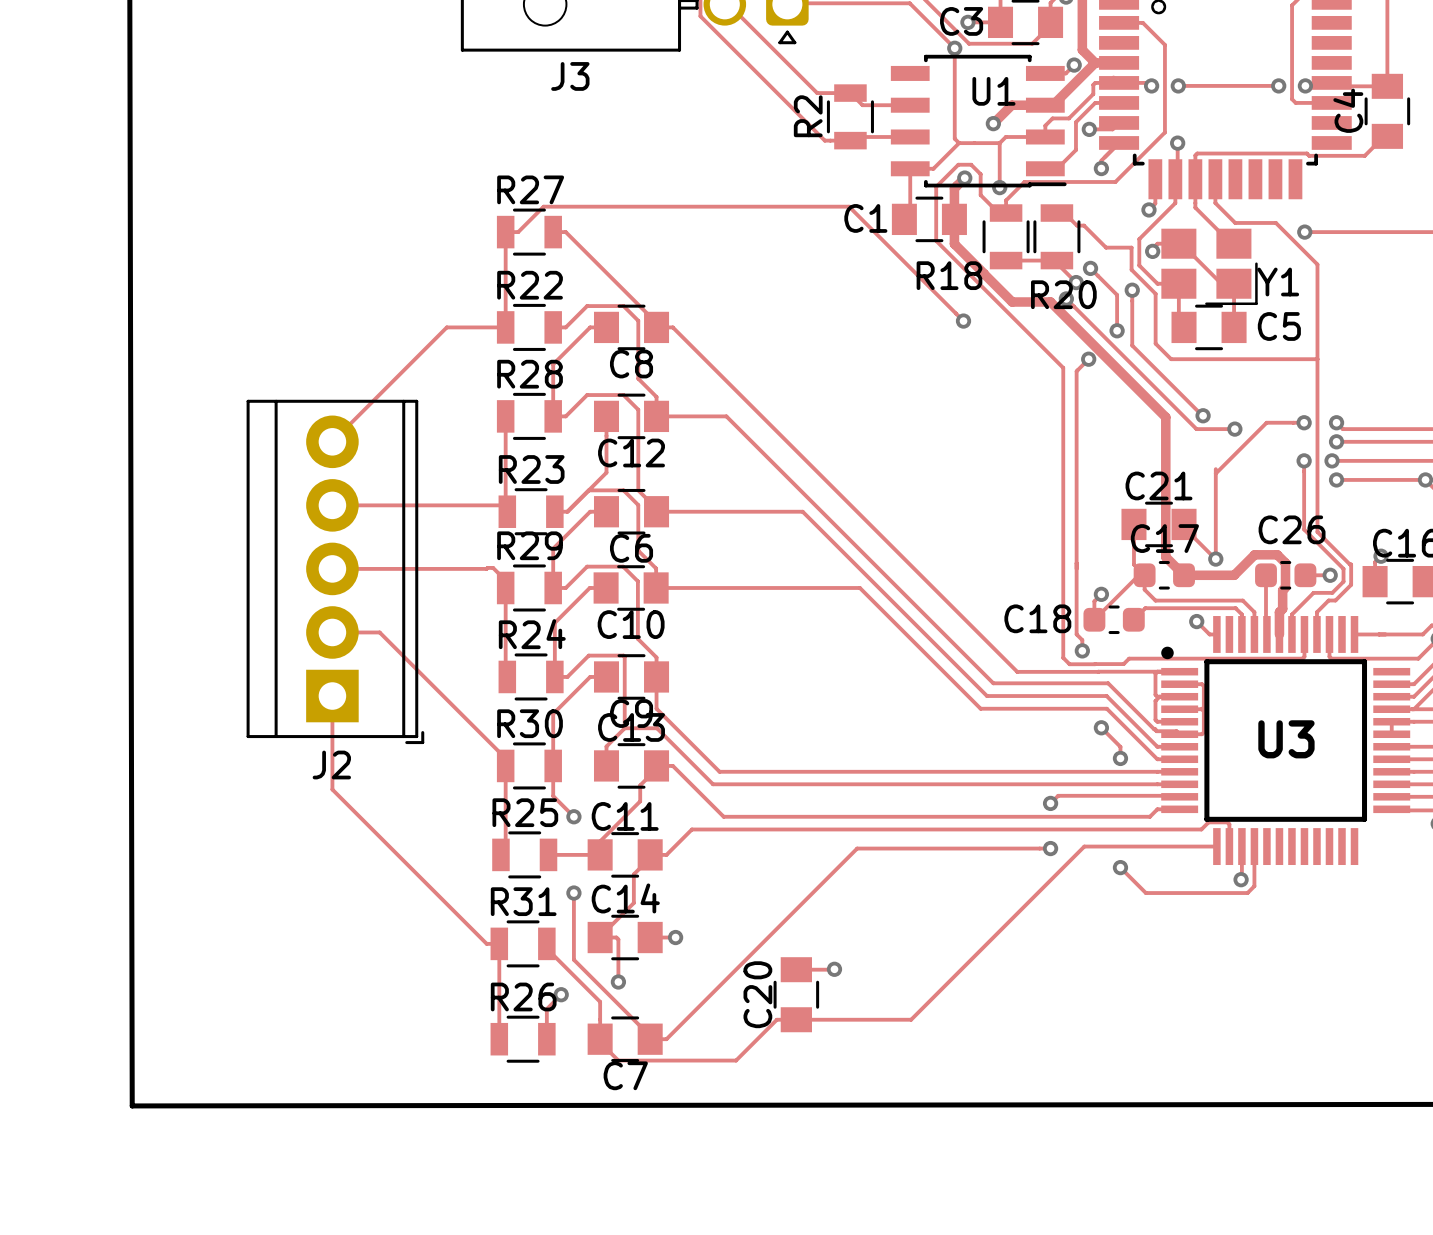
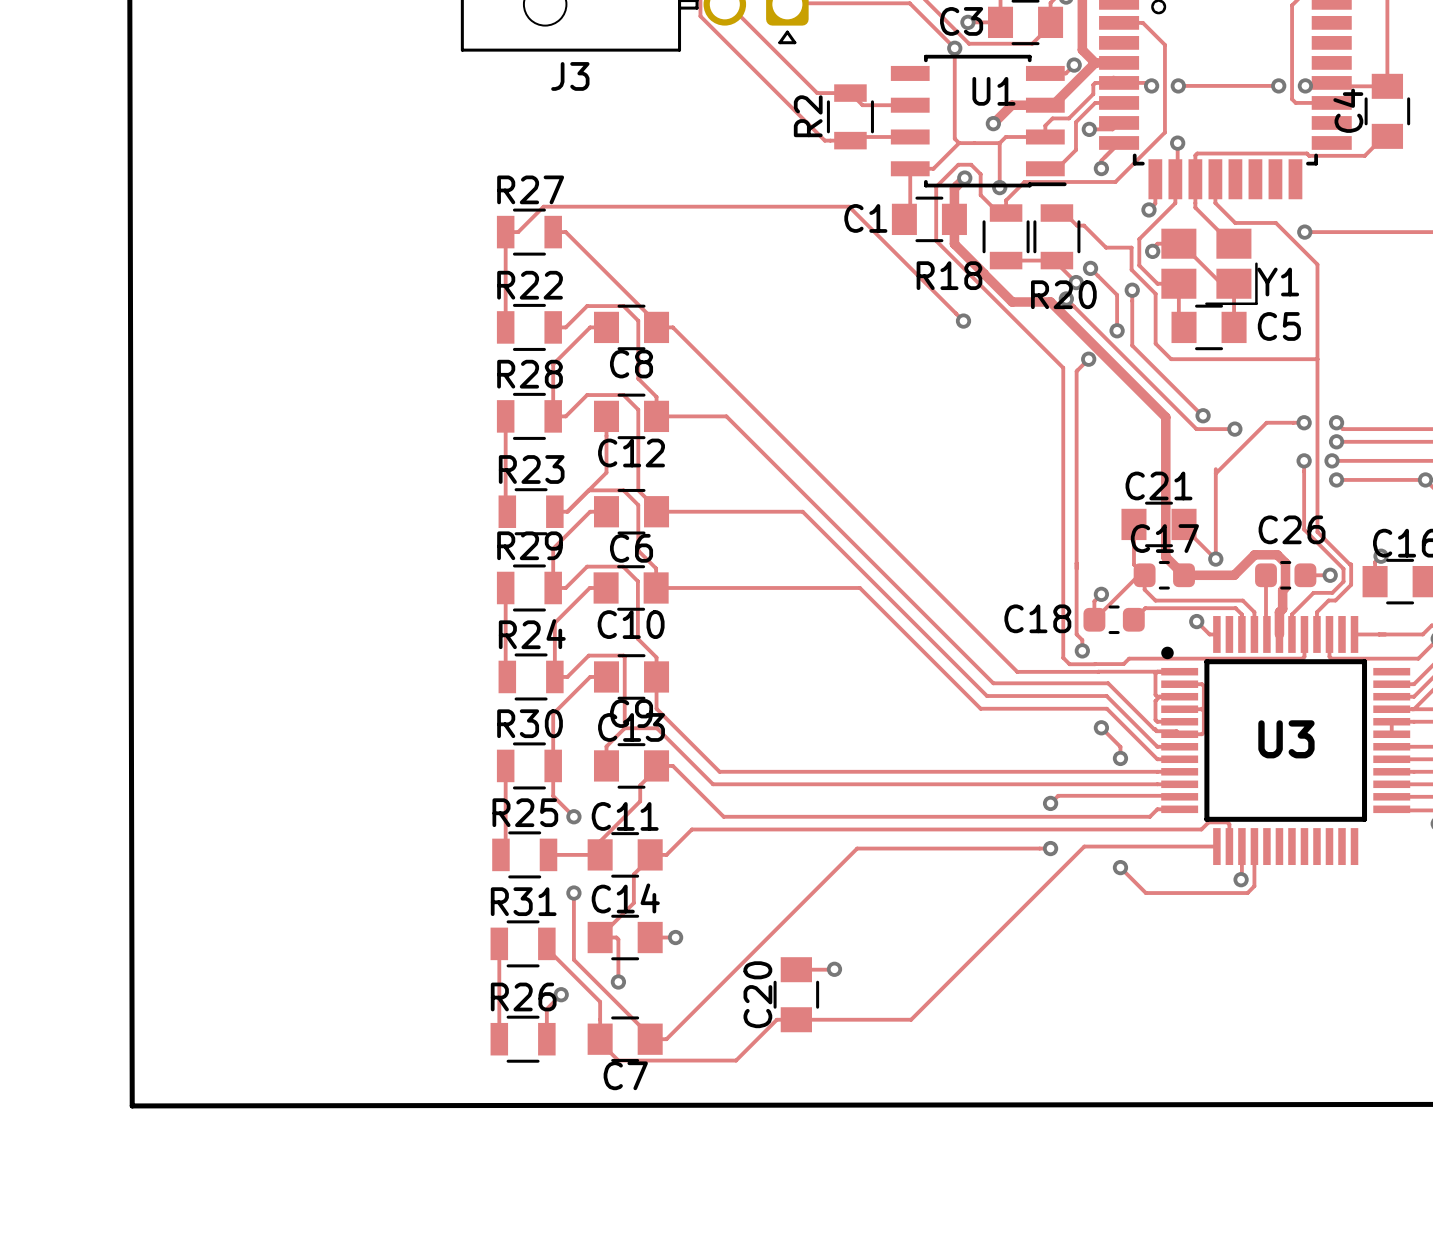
track: (505, 327) (446, 327) (332, 441) -> none
track: (332, 505) (500, 505) (505, 510) -> none
track: (332, 568) (493, 567) (505, 580) (505, 587) -> none
J2: (335, 571) -> none
track: (332, 632) (379, 632) (505, 758) (505, 765) -> none
track: (332, 696) (332, 789) (486, 943) (499, 943) -> none

